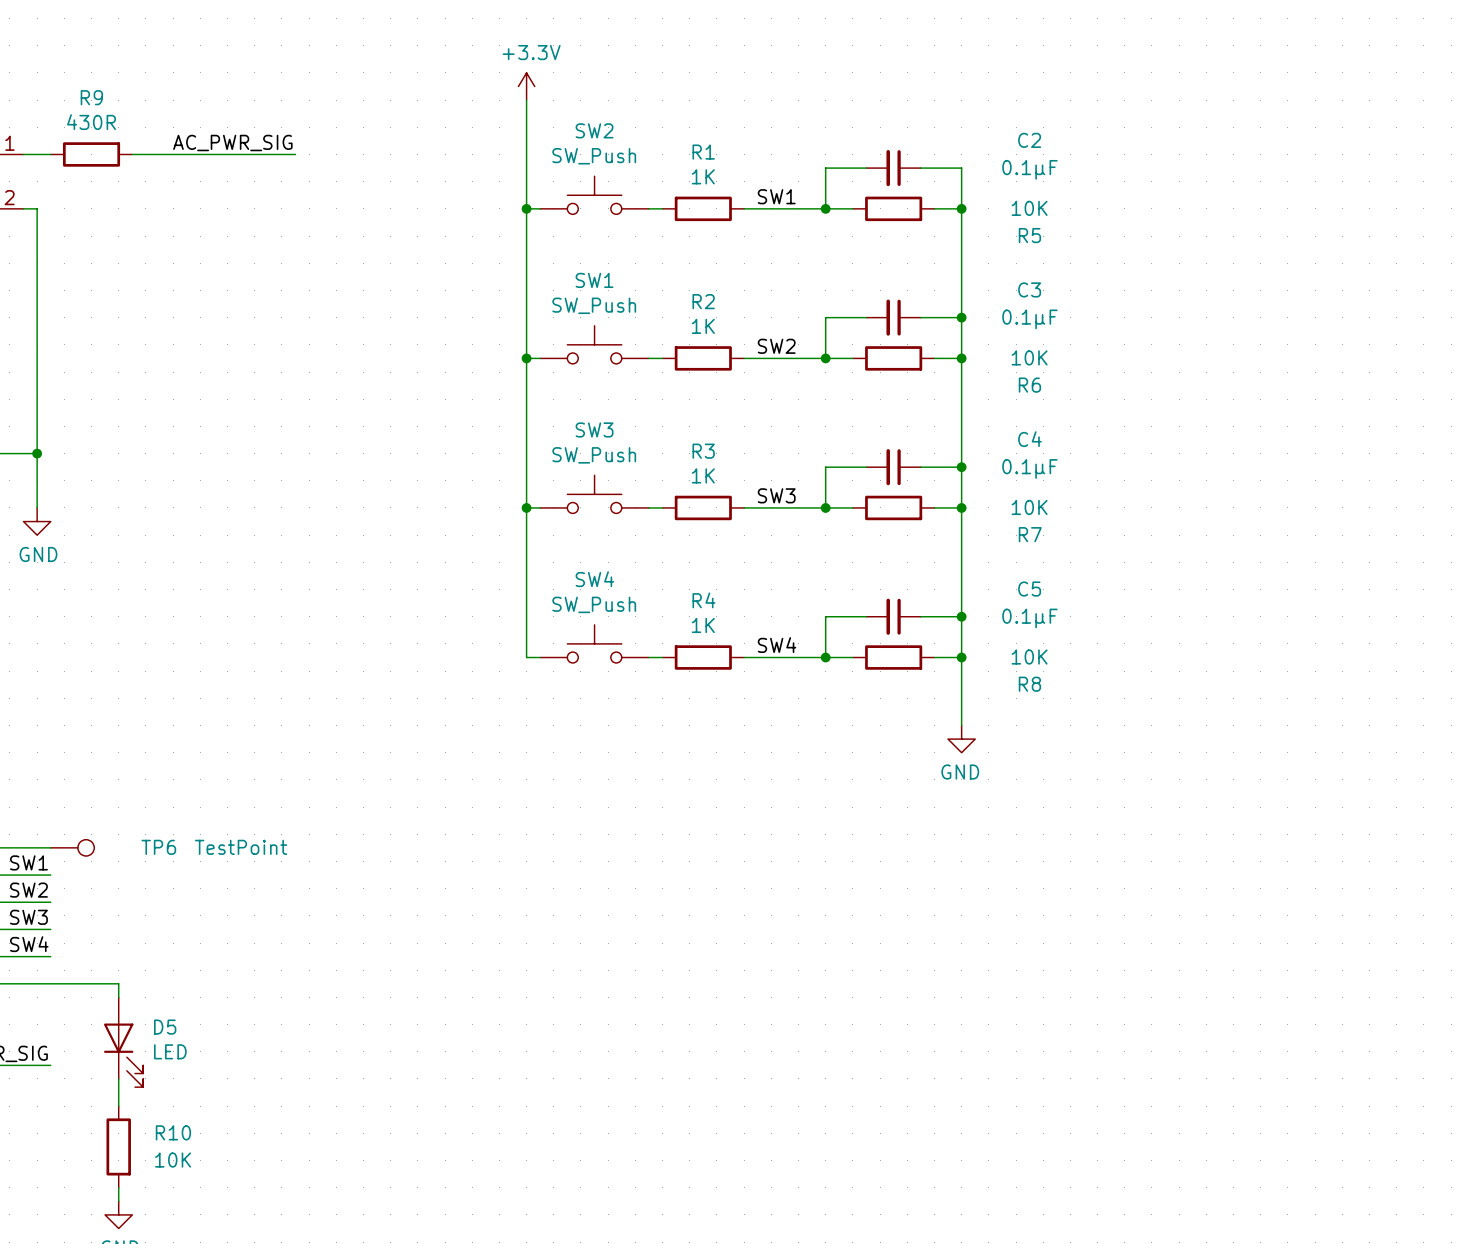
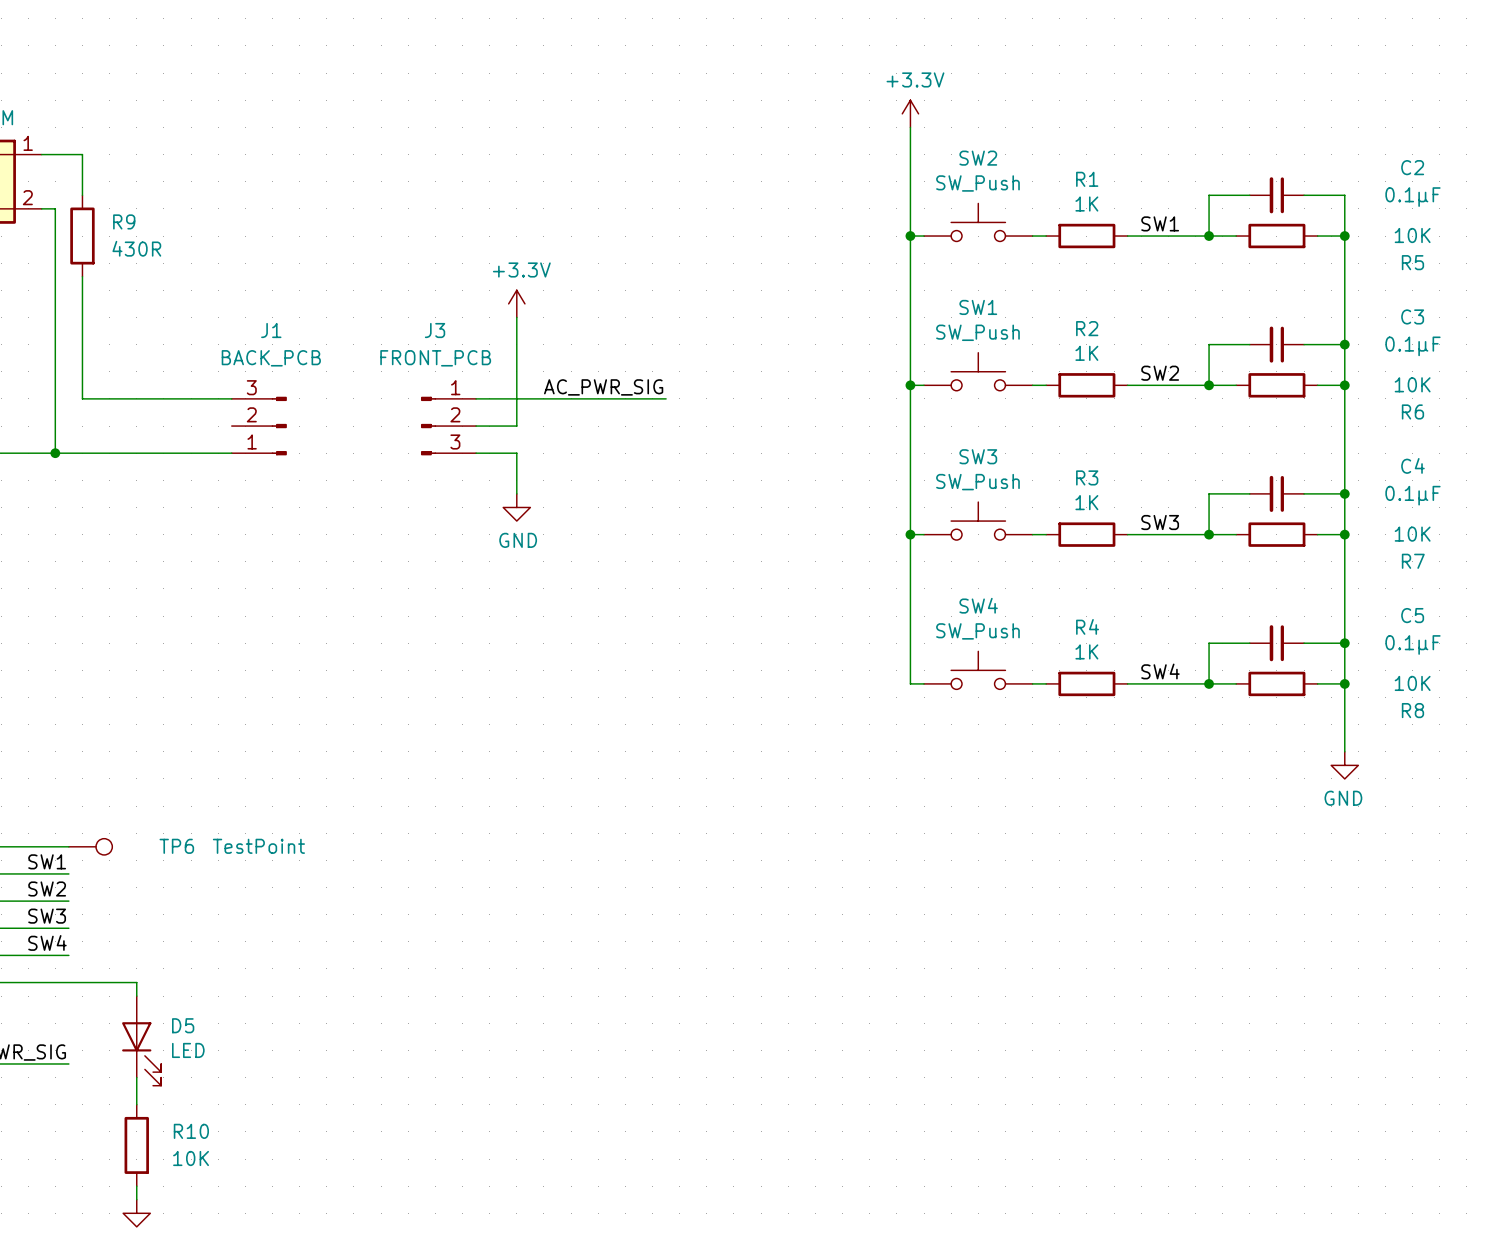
power symbol: +3.3V (526, 86) -> none
wire: (526, 100) (526, 657) (540, 657) -> none
power symbol: none -> +3.3V (910, 113)
R9 value position: 430R (91, 122) -> 430R (136, 248)
wire: none -> (910, 127) (910, 683) (924, 683)
label: AC_PWR_SIG (232, 143) -> none
wire: none -> (68, 154) (82, 154) (82, 195)
R9 rotation: 0° (91, 154) -> 90° clockwise (82, 236)
R9 position: (91, 154) -> (82, 236)
wire: (132, 154) (295, 154) -> none
wire: (866, 168) (825, 168) (825, 208) -> none
C2 position: (893, 168) -> (1276, 195)
wire: (920, 168) (961, 168) (961, 725) -> none
SW2 position: (594, 195) -> (978, 222)
wire: none -> (1249, 195) (1209, 195) (1209, 236)
wire: none -> (1304, 195) (1344, 195) (1344, 751)
label: SW1 (776, 196) -> none
wire: (526, 208) (540, 208) -> none
junction: (526, 208) -> none
wire: (648, 208) (662, 208) -> (910, 236) (924, 236)
R1 position: (703, 208) -> (1086, 236)
wire: (744, 208) (852, 208) -> none
junction: (825, 208) -> none
R5 position: (893, 208) -> (1276, 236)
wire: (934, 208) (961, 208) -> none
junction: (961, 208) -> none
label: none -> SW1 (1160, 223)
junction: none -> (910, 236)
wire: none -> (1127, 236) (1236, 236)
junction: none -> (1209, 236)
wire: none -> (1317, 236) (1344, 236)
junction: none -> (1344, 236)
wire: none -> (82, 276) (82, 398) (231, 398)
power symbol: none -> +3.3V (516, 303)
wire: none -> (516, 317) (516, 426) (476, 426)
wire: (866, 317) (825, 317) (825, 358) -> none
C3 position: (893, 317) -> (1276, 344)
wire: (920, 317) (961, 317) -> none
junction: (961, 317) -> none
SW1 position: (594, 344) -> (978, 371)
wire: none -> (1249, 344) (1209, 344) (1209, 385)
wire: none -> (1304, 344) (1344, 344)
junction: none -> (1344, 344)
label: SW2 (776, 346) -> none
wire: (526, 358) (540, 358) -> none
junction: (526, 358) -> none
wire: (648, 358) (662, 358) -> (910, 385) (924, 385)
R2 position: (703, 358) -> (1086, 385)
wire: (744, 358) (852, 358) -> none
junction: (825, 358) -> none
R6 position: (893, 358) -> (1276, 385)
wire: (934, 358) (961, 358) -> none
junction: (961, 358) -> none
label: none -> SW2 (1160, 373)
junction: none -> (910, 385)
wire: none -> (1127, 385) (1236, 385)
junction: none -> (1209, 385)
wire: none -> (1317, 385) (1344, 385)
junction: none -> (1344, 385)
label: none -> AC_PWR_SIG (603, 387)
wire: none -> (476, 398) (666, 398)
J1: none -> BACK_PCB (259, 426)
J3: none -> FRONT_PCB (448, 426)
wire: (37, 453) (37, 507) -> (55, 453) (231, 453)
wire: none -> (476, 453) (516, 453) (516, 493)
wire: (866, 467) (825, 467) (825, 507) -> none
C4 position: (893, 467) -> (1276, 493)
wire: (920, 467) (961, 467) -> none
junction: (961, 467) -> none
SW3 position: (594, 494) -> (978, 521)
wire: none -> (1249, 493) (1209, 493) (1209, 534)
wire: none -> (1304, 493) (1344, 493)
junction: none -> (1344, 493)
label: SW3 (776, 495) -> none
power symbol: none -> GND (516, 507)
wire: (526, 507) (540, 507) -> none
junction: (526, 507) -> none
wire: (648, 507) (662, 507) -> (910, 534) (924, 534)
R3 position: (703, 507) -> (1086, 534)
wire: (744, 507) (852, 507) -> none
junction: (825, 507) -> none
R7 position: (893, 507) -> (1276, 534)
wire: (934, 507) (961, 507) -> none
junction: (961, 507) -> none
power symbol: GND (37, 521) -> none
label: none -> SW3 (1160, 522)
junction: none -> (910, 534)
wire: none -> (1127, 534) (1236, 534)
junction: none -> (1209, 534)
wire: none -> (1317, 534) (1344, 534)
junction: none -> (1344, 534)
wire: (866, 616) (825, 616) (825, 657) -> none
C5 position: (893, 616) -> (1276, 643)
wire: (920, 616) (961, 616) -> none
junction: (961, 616) -> none
SW4 position: (594, 643) -> (978, 670)
wire: none -> (1249, 643) (1209, 643) (1209, 683)
wire: none -> (1304, 643) (1344, 643)
junction: none -> (1344, 643)
label: SW4 (777, 645) -> none
wire: (648, 657) (662, 657) -> none
R4 position: (703, 657) -> (1086, 683)
wire: (744, 657) (852, 657) -> none
junction: (825, 657) -> none
R8 position: (893, 657) -> (1276, 683)
wire: (934, 657) (961, 657) -> none
junction: (961, 657) -> none
label: none -> SW4 (1160, 671)
wire: none -> (1127, 683) (1236, 683)
junction: none -> (1209, 683)
wire: none -> (1317, 683) (1344, 683)
junction: none -> (1344, 683)
power symbol: GND (961, 739) -> none
power symbol: none -> GND (1344, 765)

